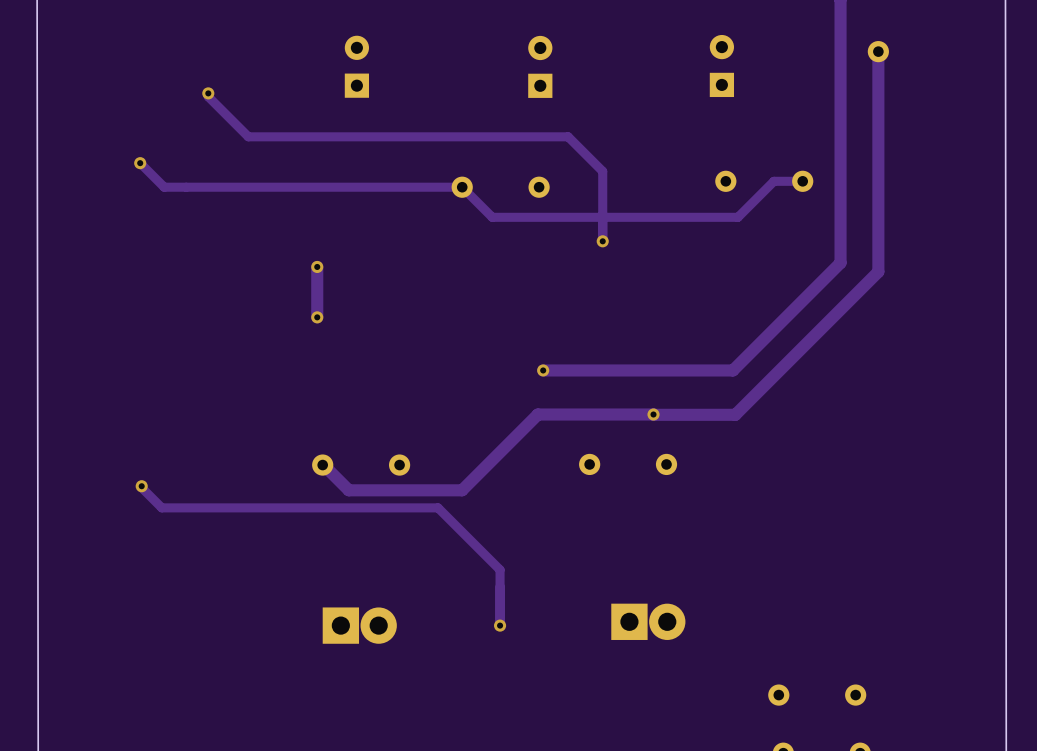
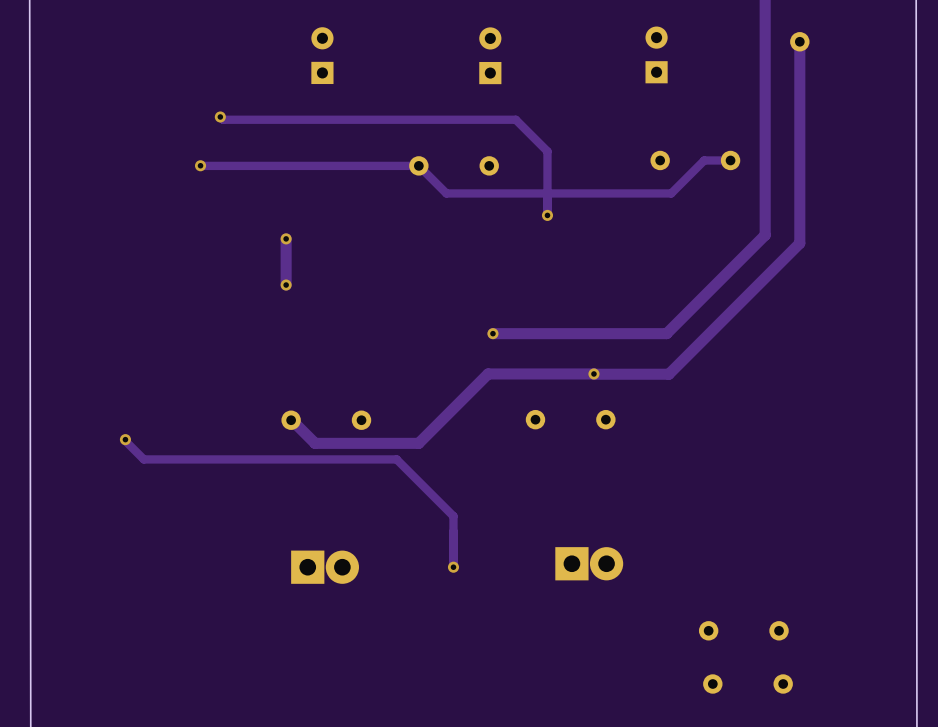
track: (208, 93) (208, 96) (245, 133) -> none
via: (208, 93) -> none
via: none -> (220, 116)
track: (140, 163) (164, 187) (223, 187) -> none
via: (140, 163) -> none
via: none -> (200, 165)

